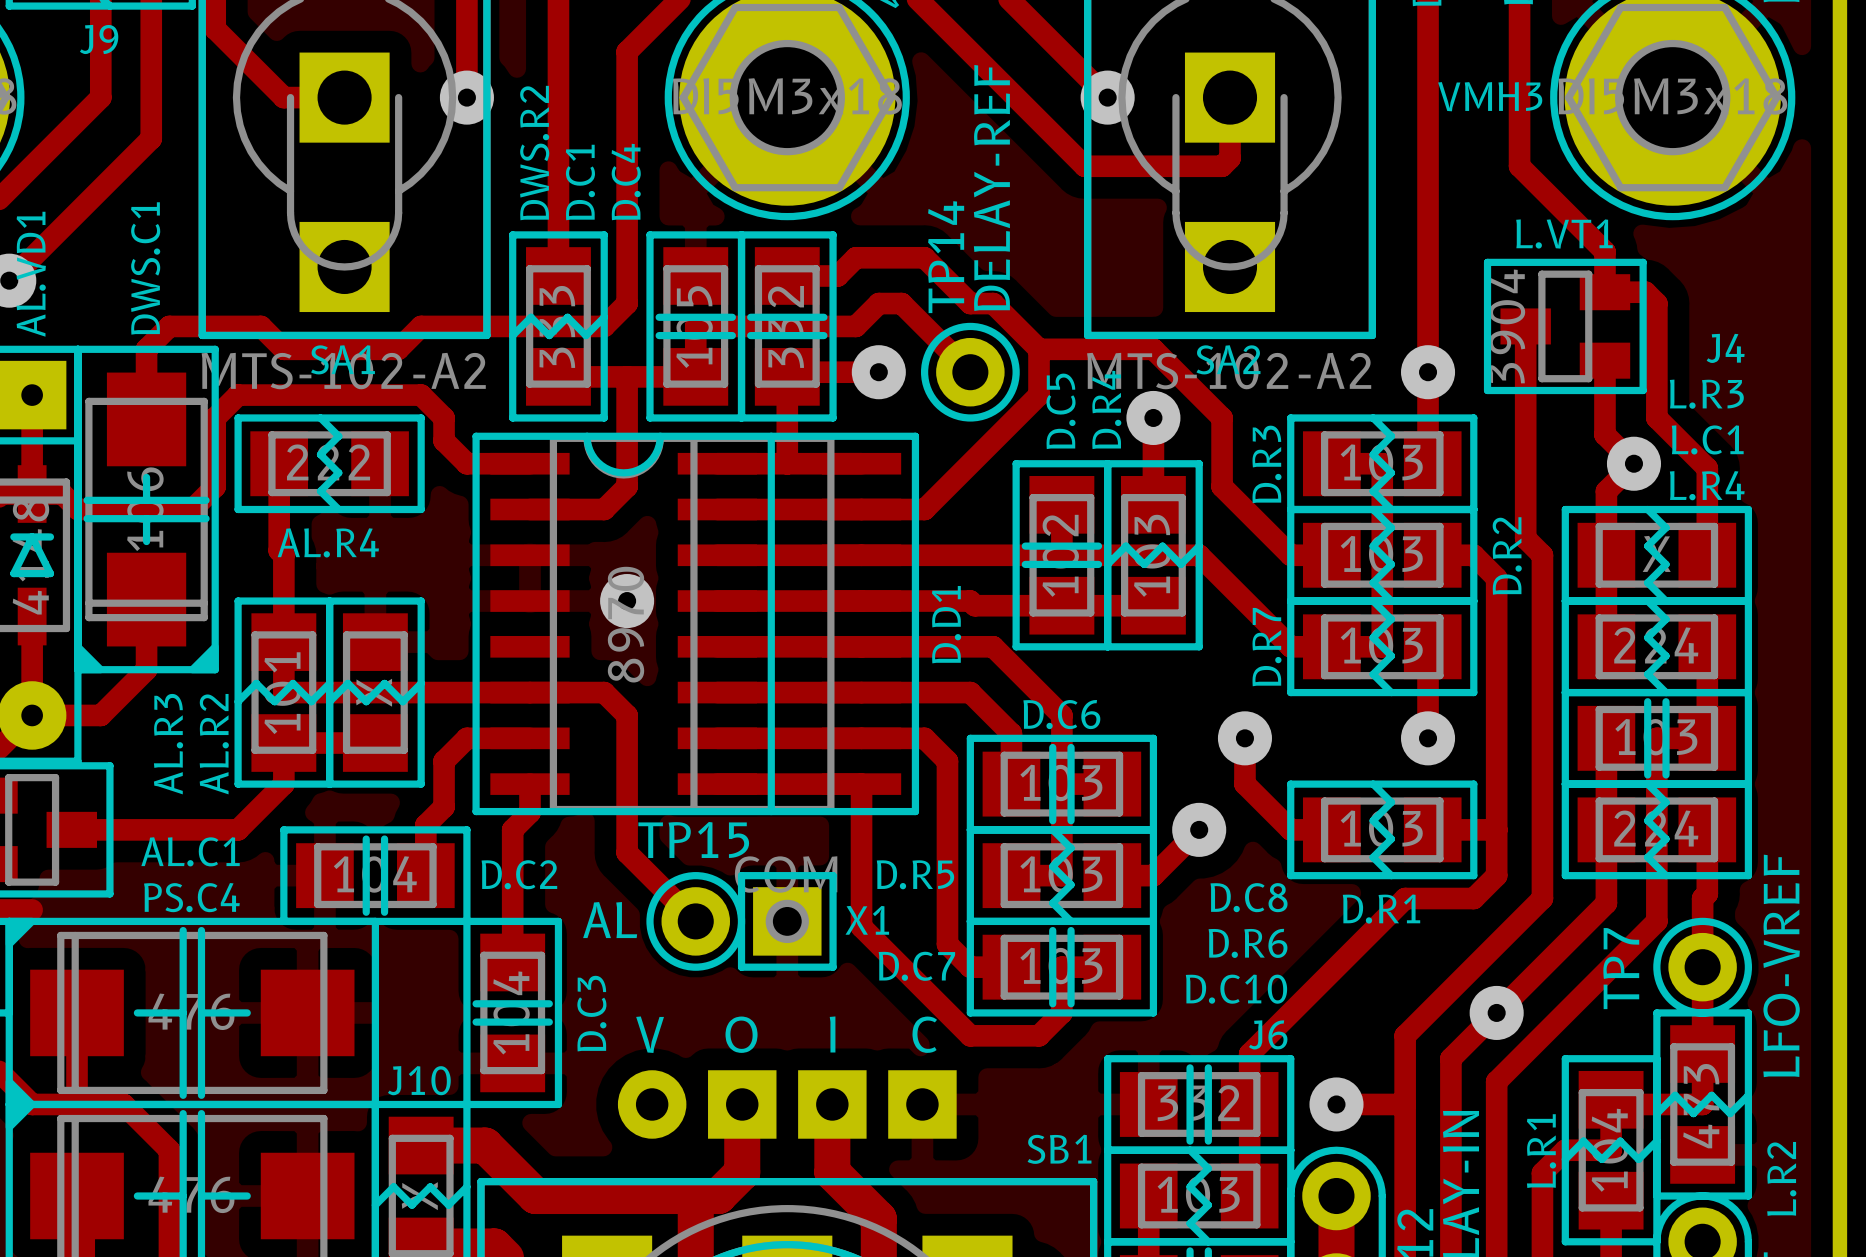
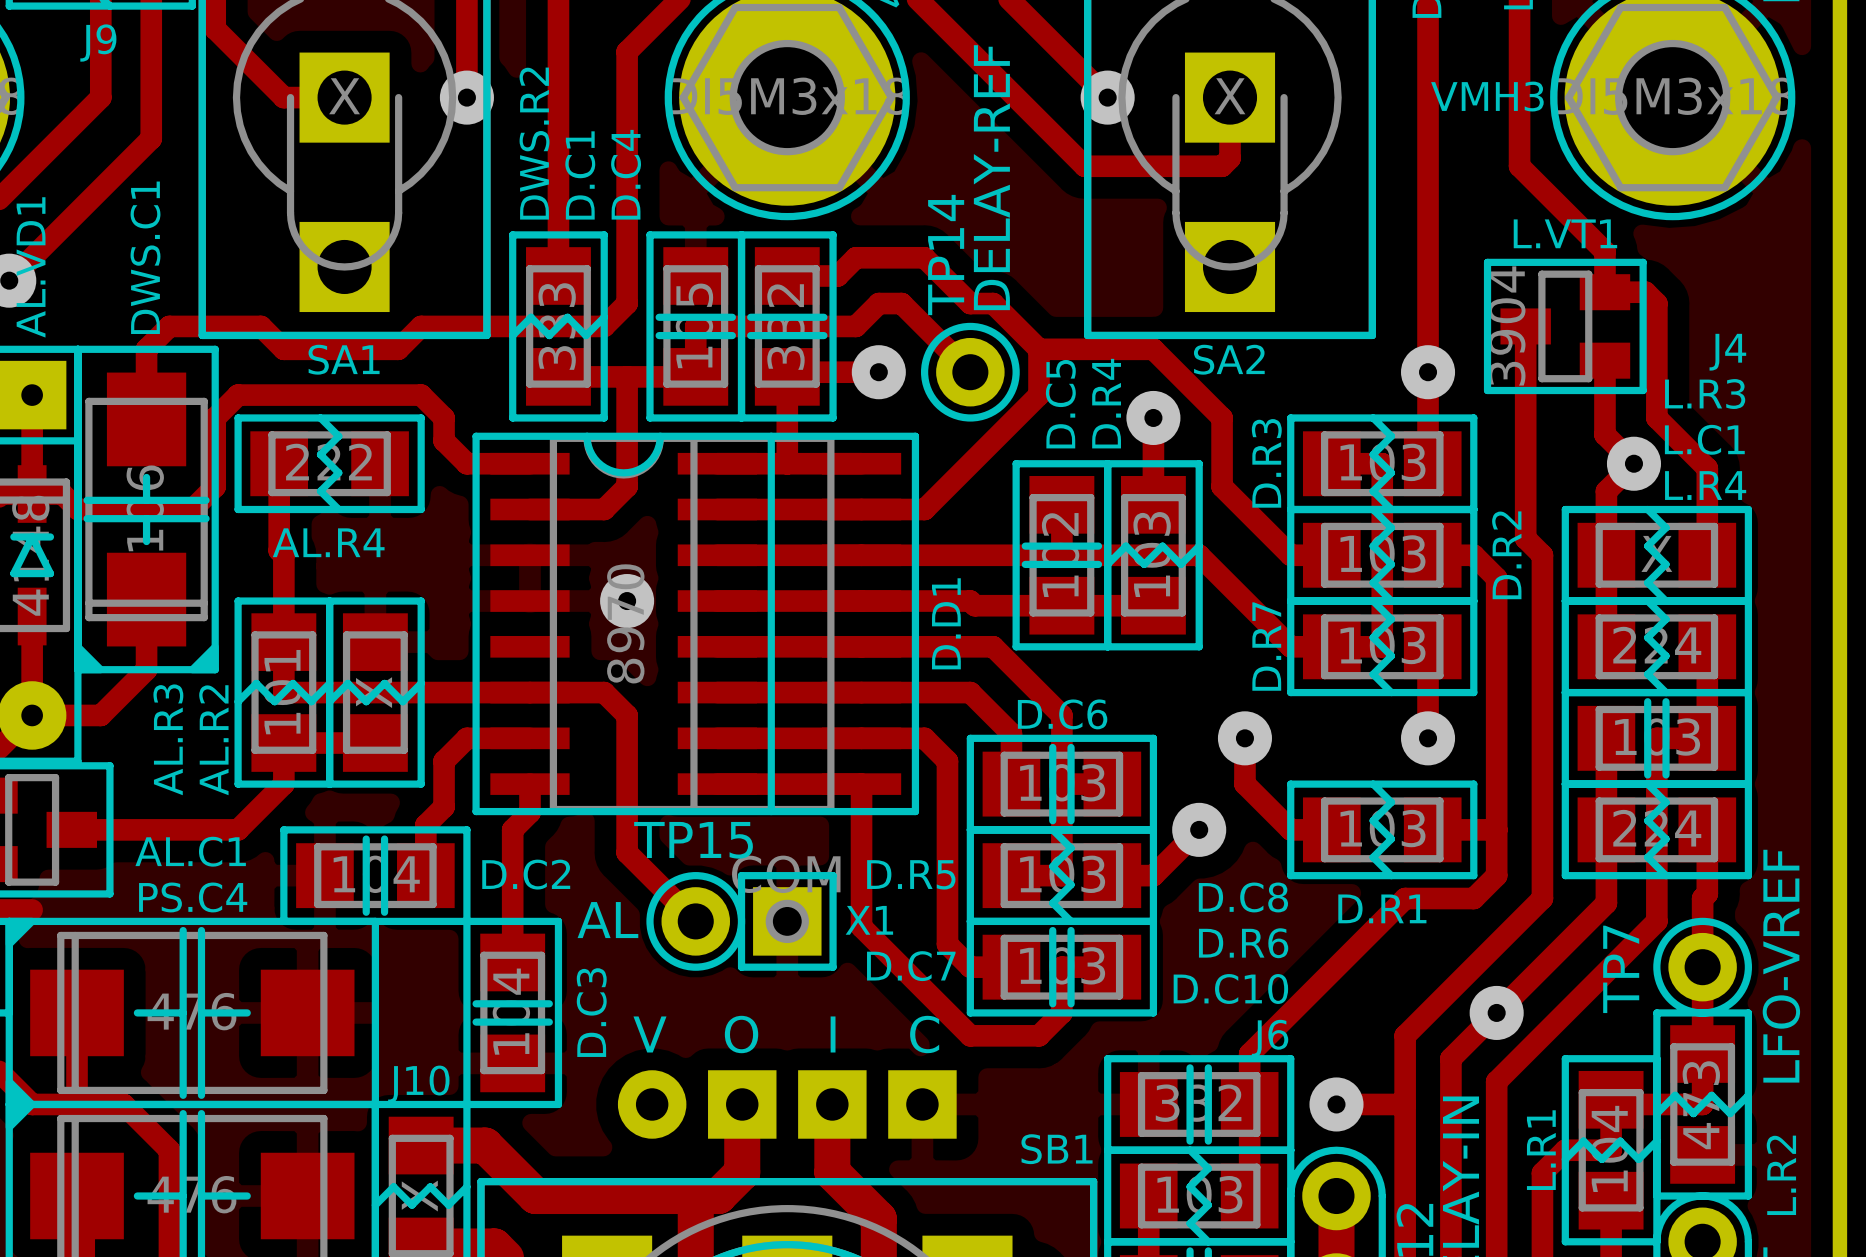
SA1 value: MTS-102-A2 (343, 371) -> X (344, 96)
SA2 value: MTS-102-A2 (1229, 371) -> X (1229, 96)

